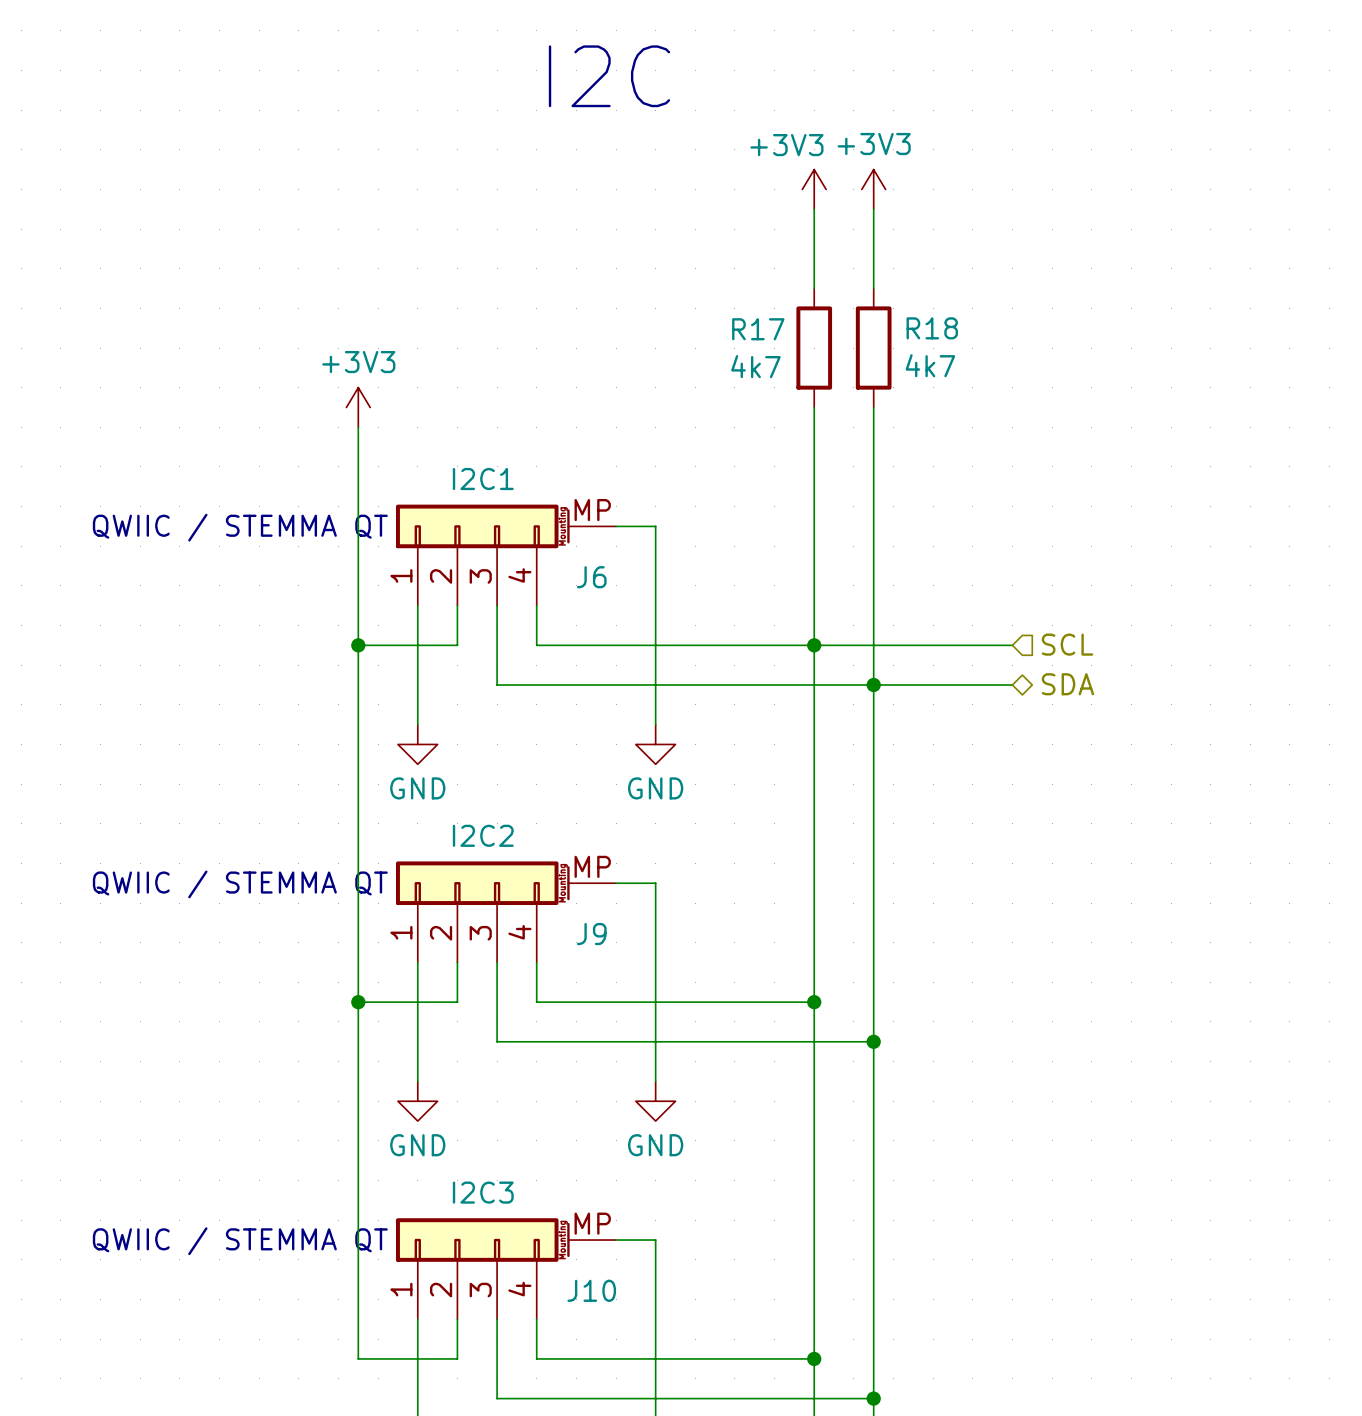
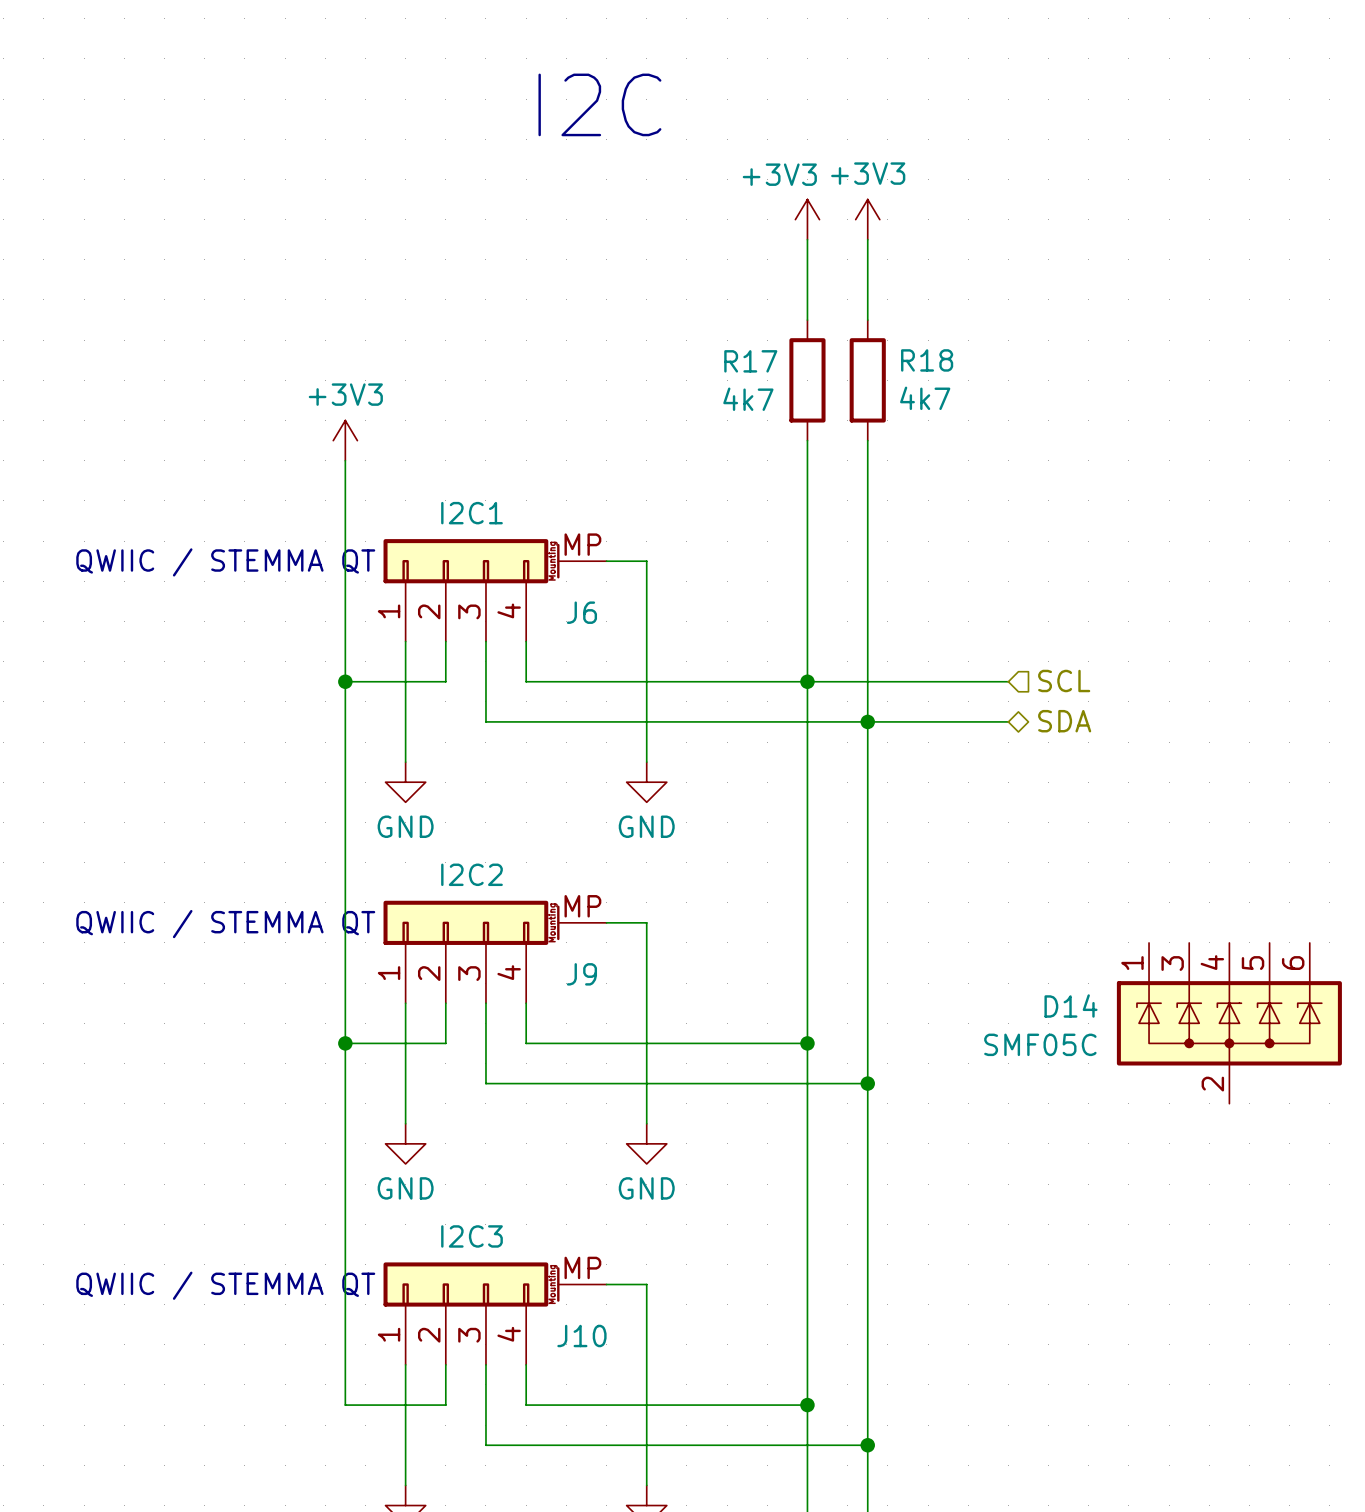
D14: none -> SMF05C (1229, 1023)

